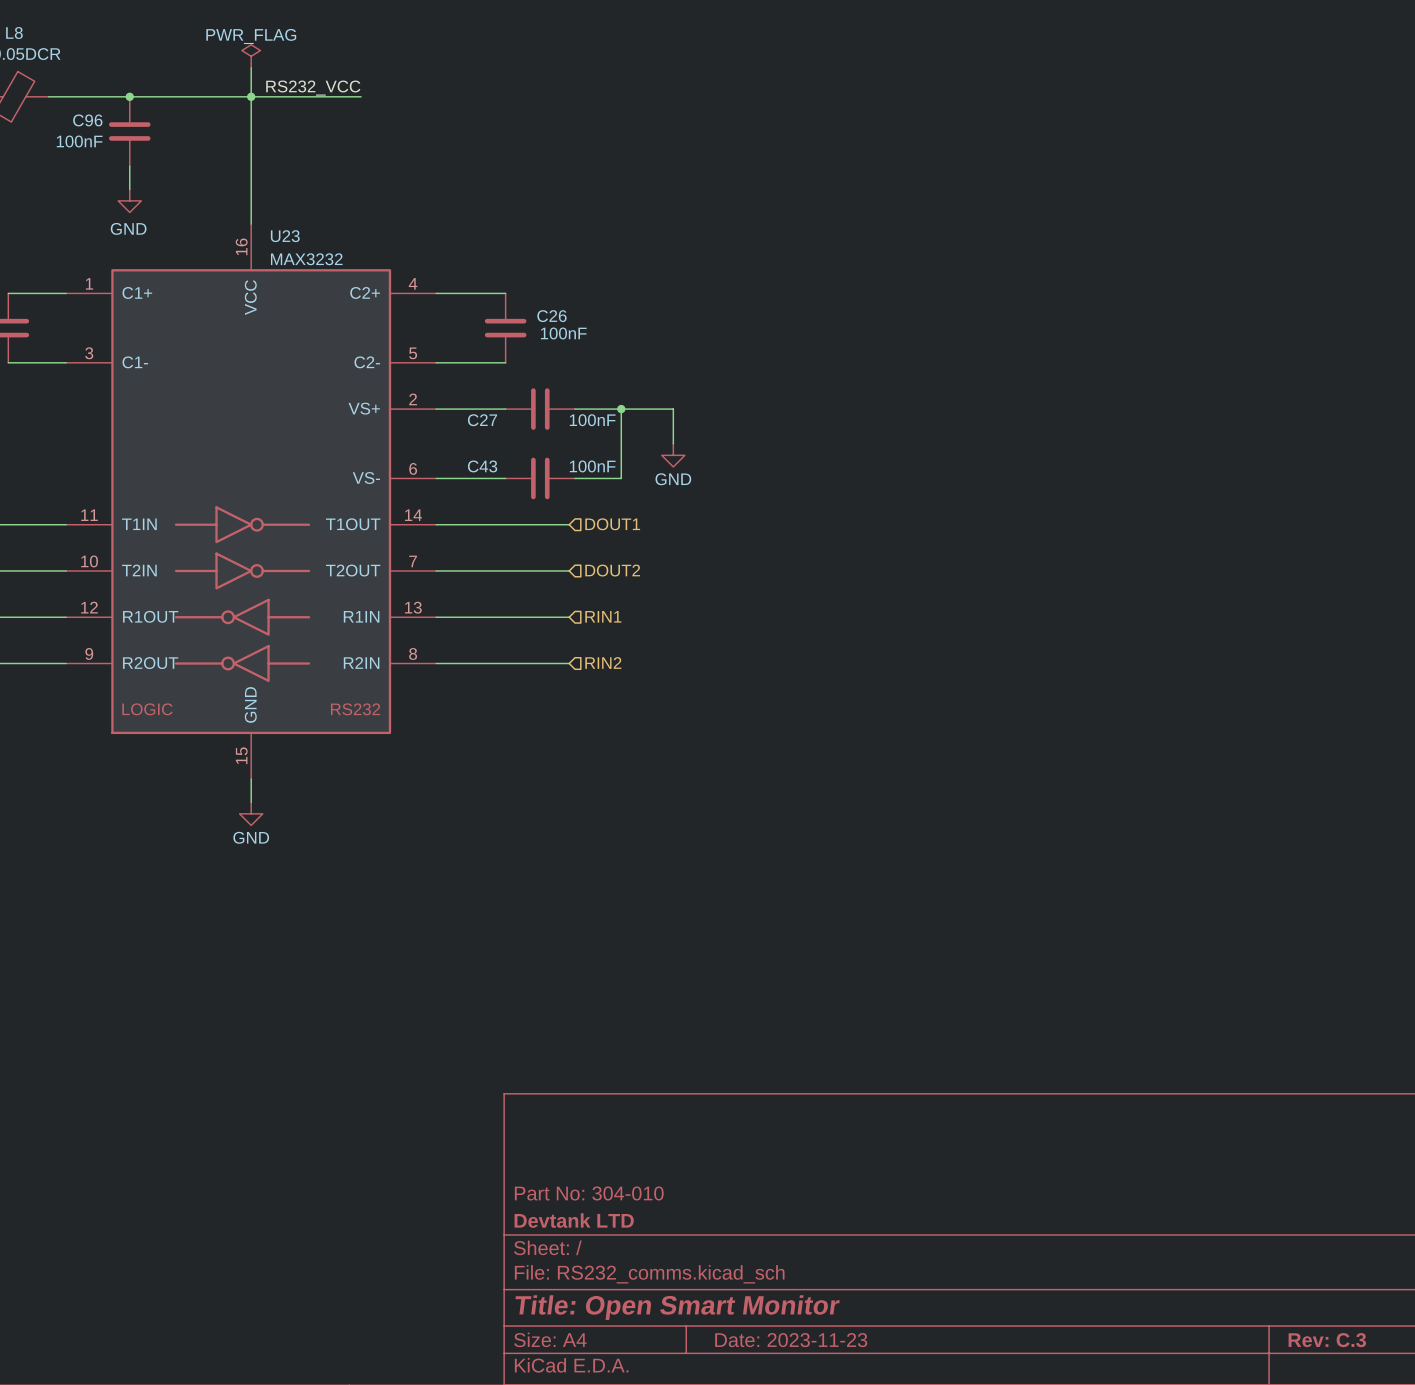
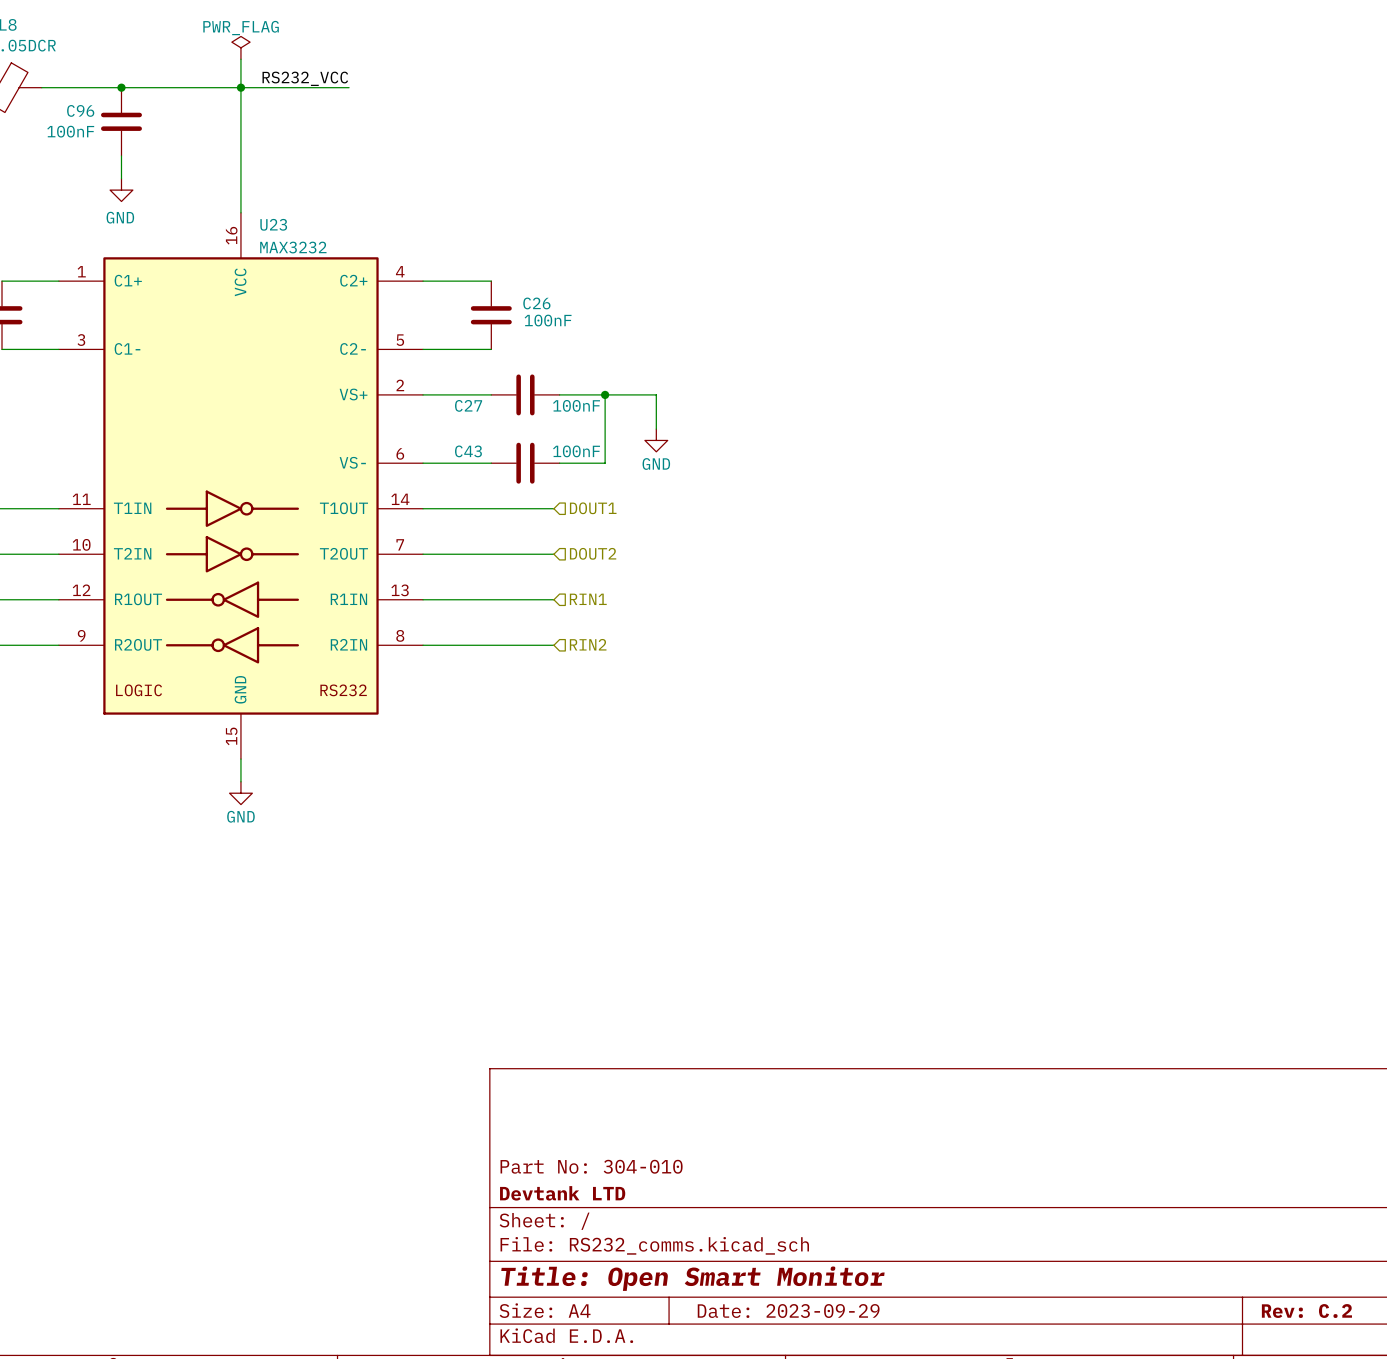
title block: Date: 2023-11-23 (791, 1340) -> Date: 2023-09-29 (788, 1311)
title block: Rev: C.3 (1327, 1340) -> Rev: C.2 (1306, 1311)

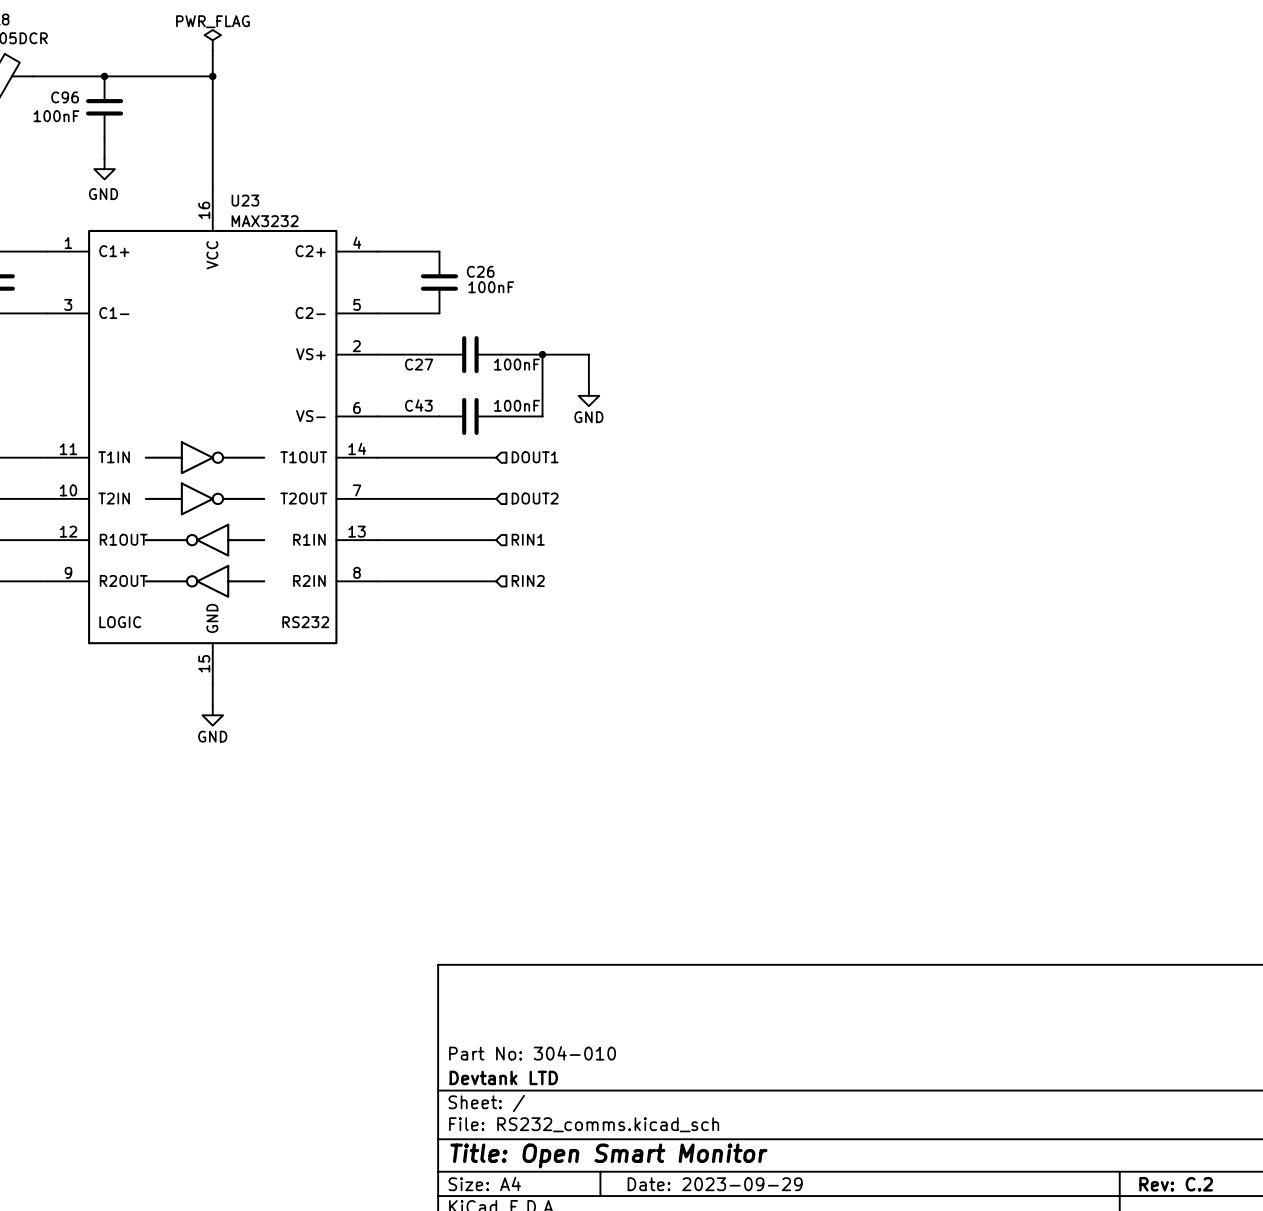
label: RS232_VCC (305, 78) -> none
wire: (240, 87) (349, 87) -> none

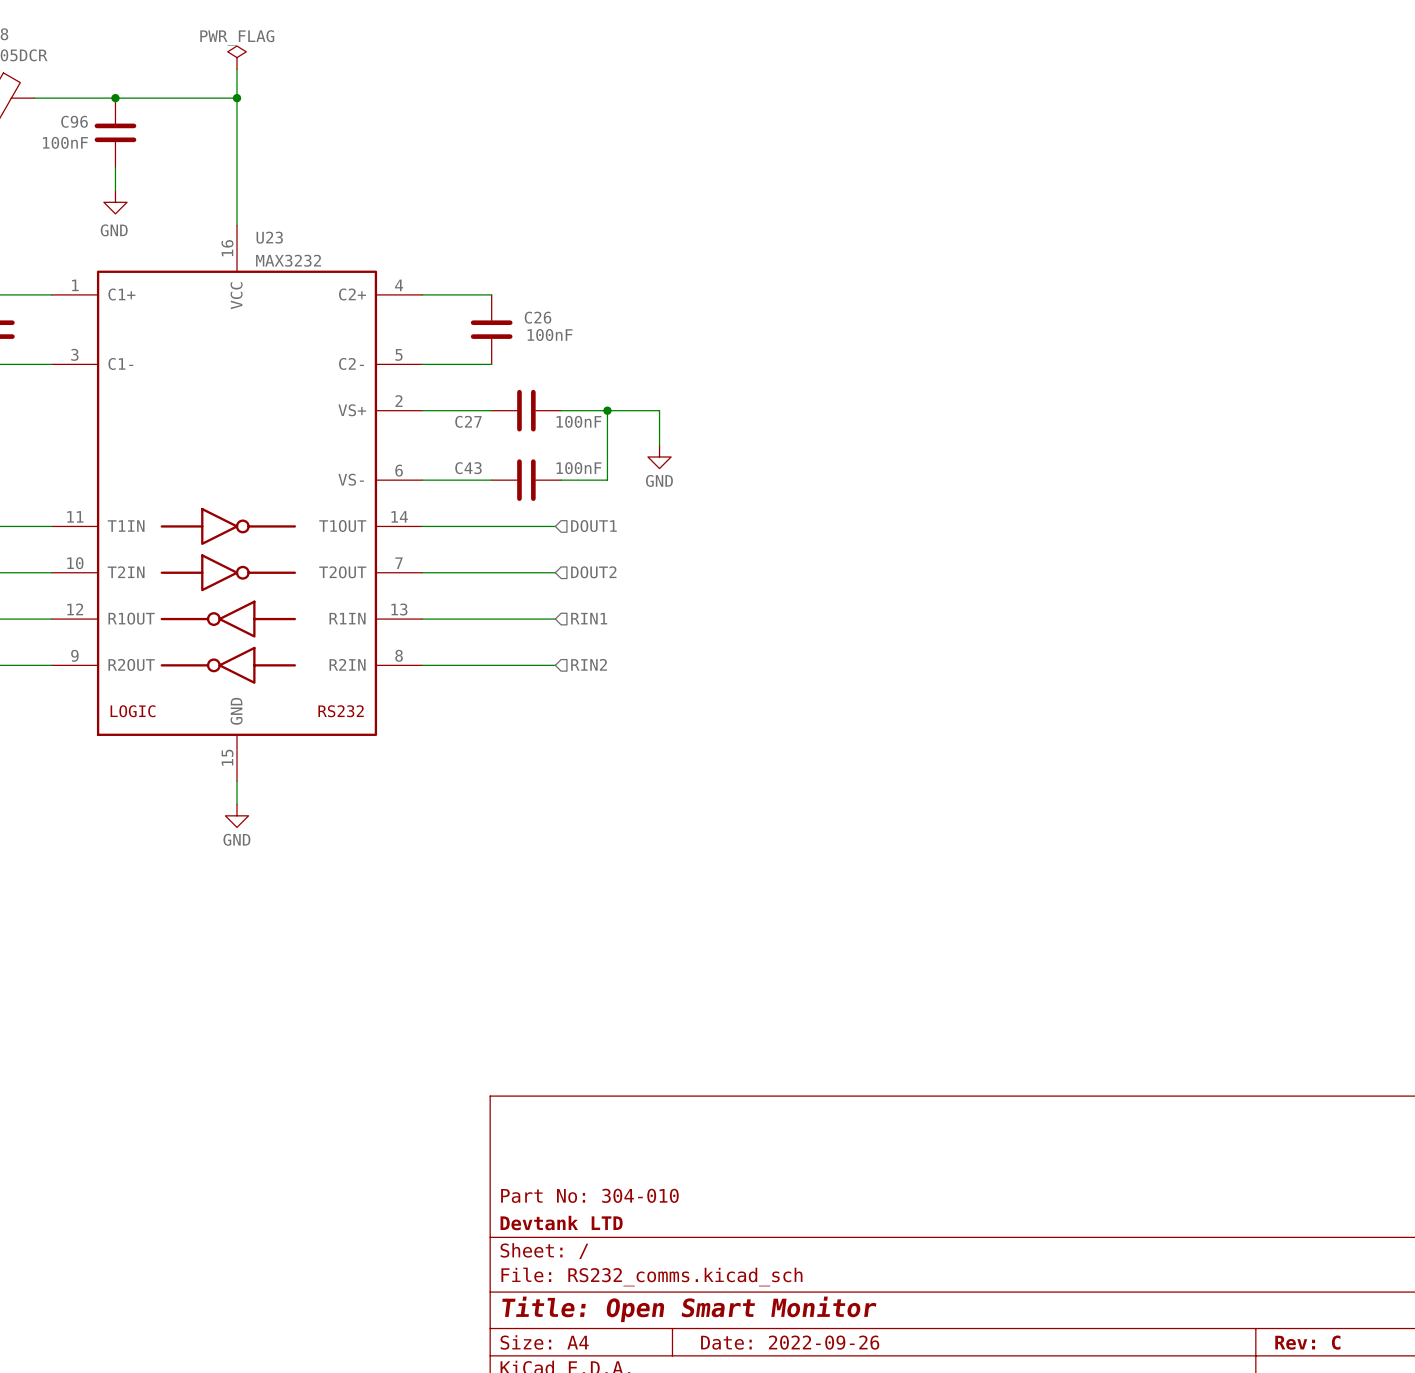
title block: Date: 2023-09-29 (715, 1184) -> Date: 2022-09-26 (790, 1342)
title block: Rev: C.2 (1176, 1184) -> Rev: C (1307, 1342)

